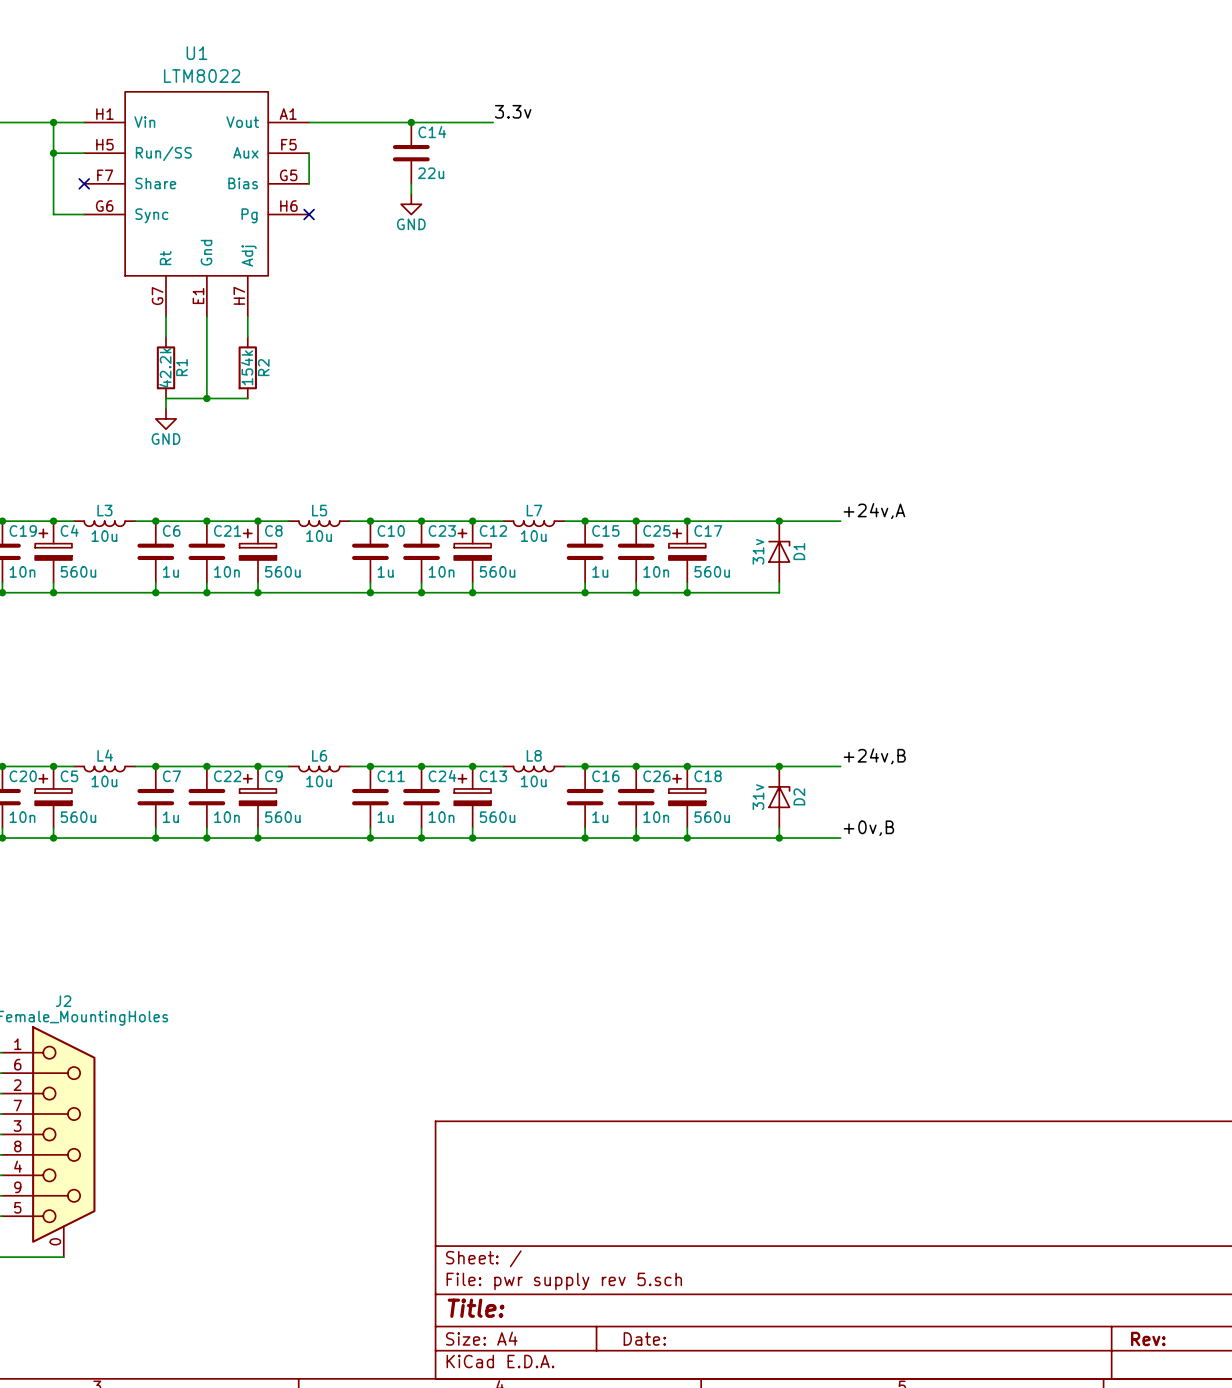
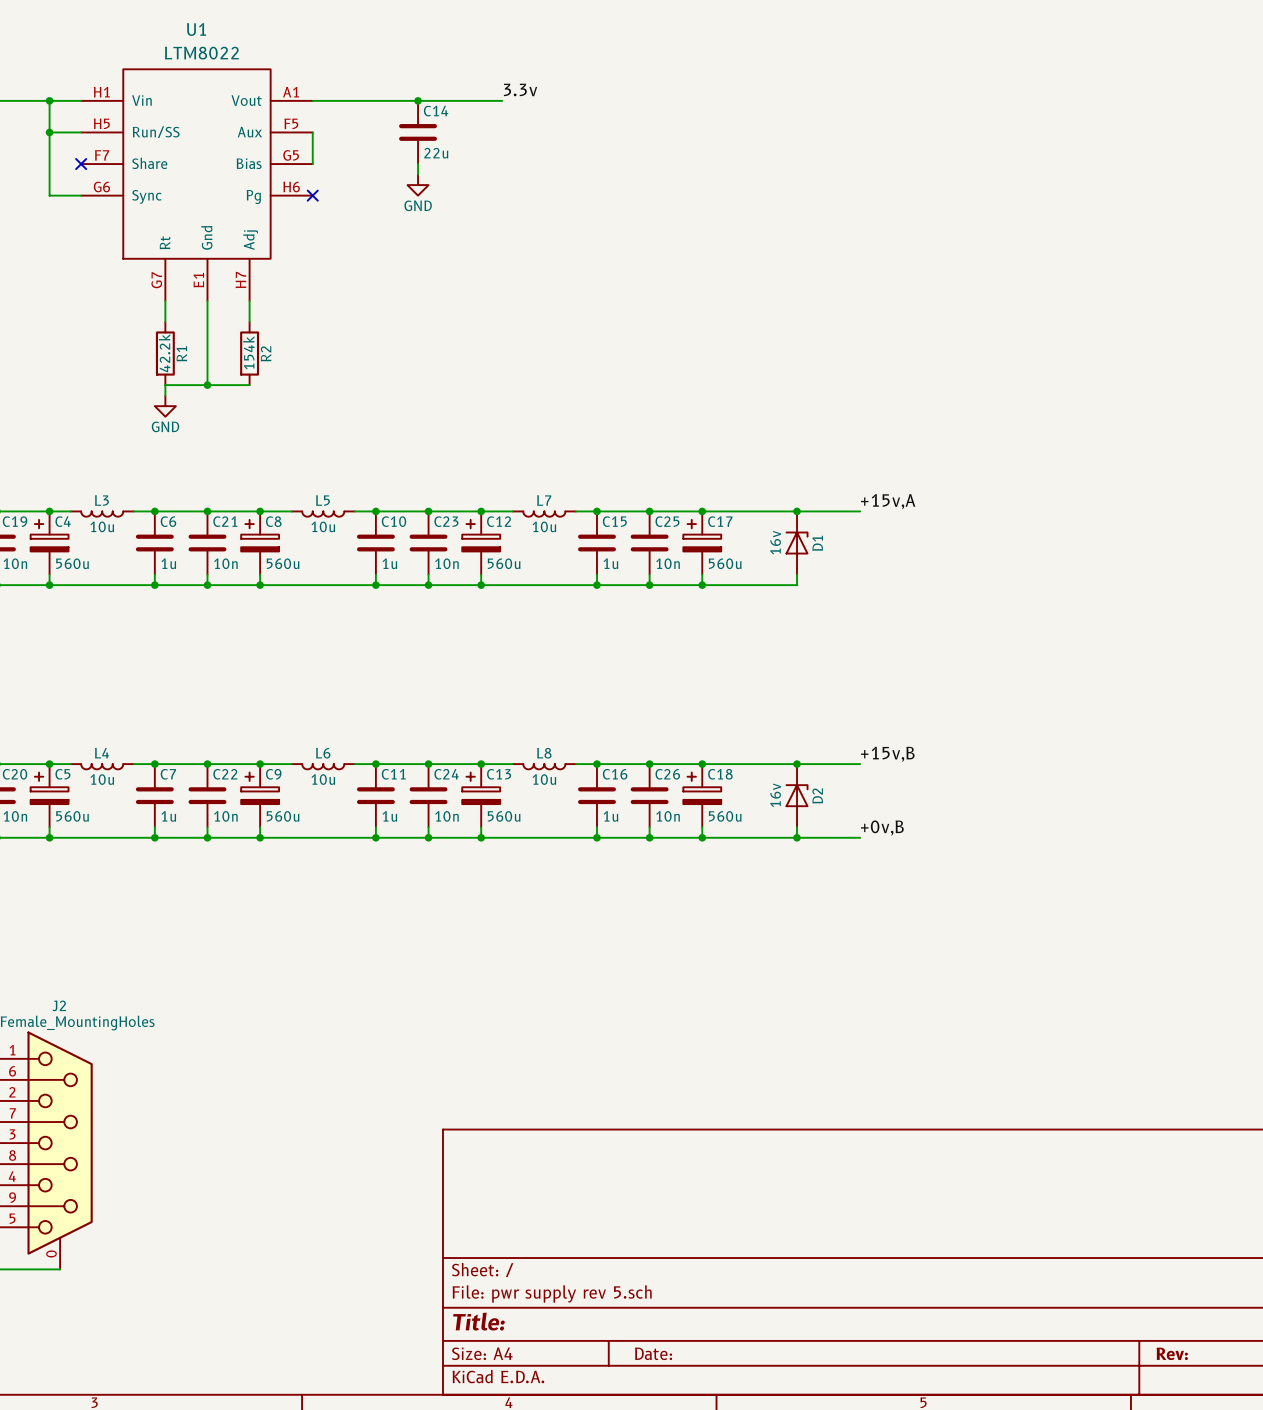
label: +24v,A (874, 511) -> +15v,A (888, 501)
D1 value: 31v (758, 551) -> 16v (775, 542)
label: +24v,B (874, 756) -> +15v,B (887, 754)
D2 value: 31v (758, 797) -> 16v (775, 795)

